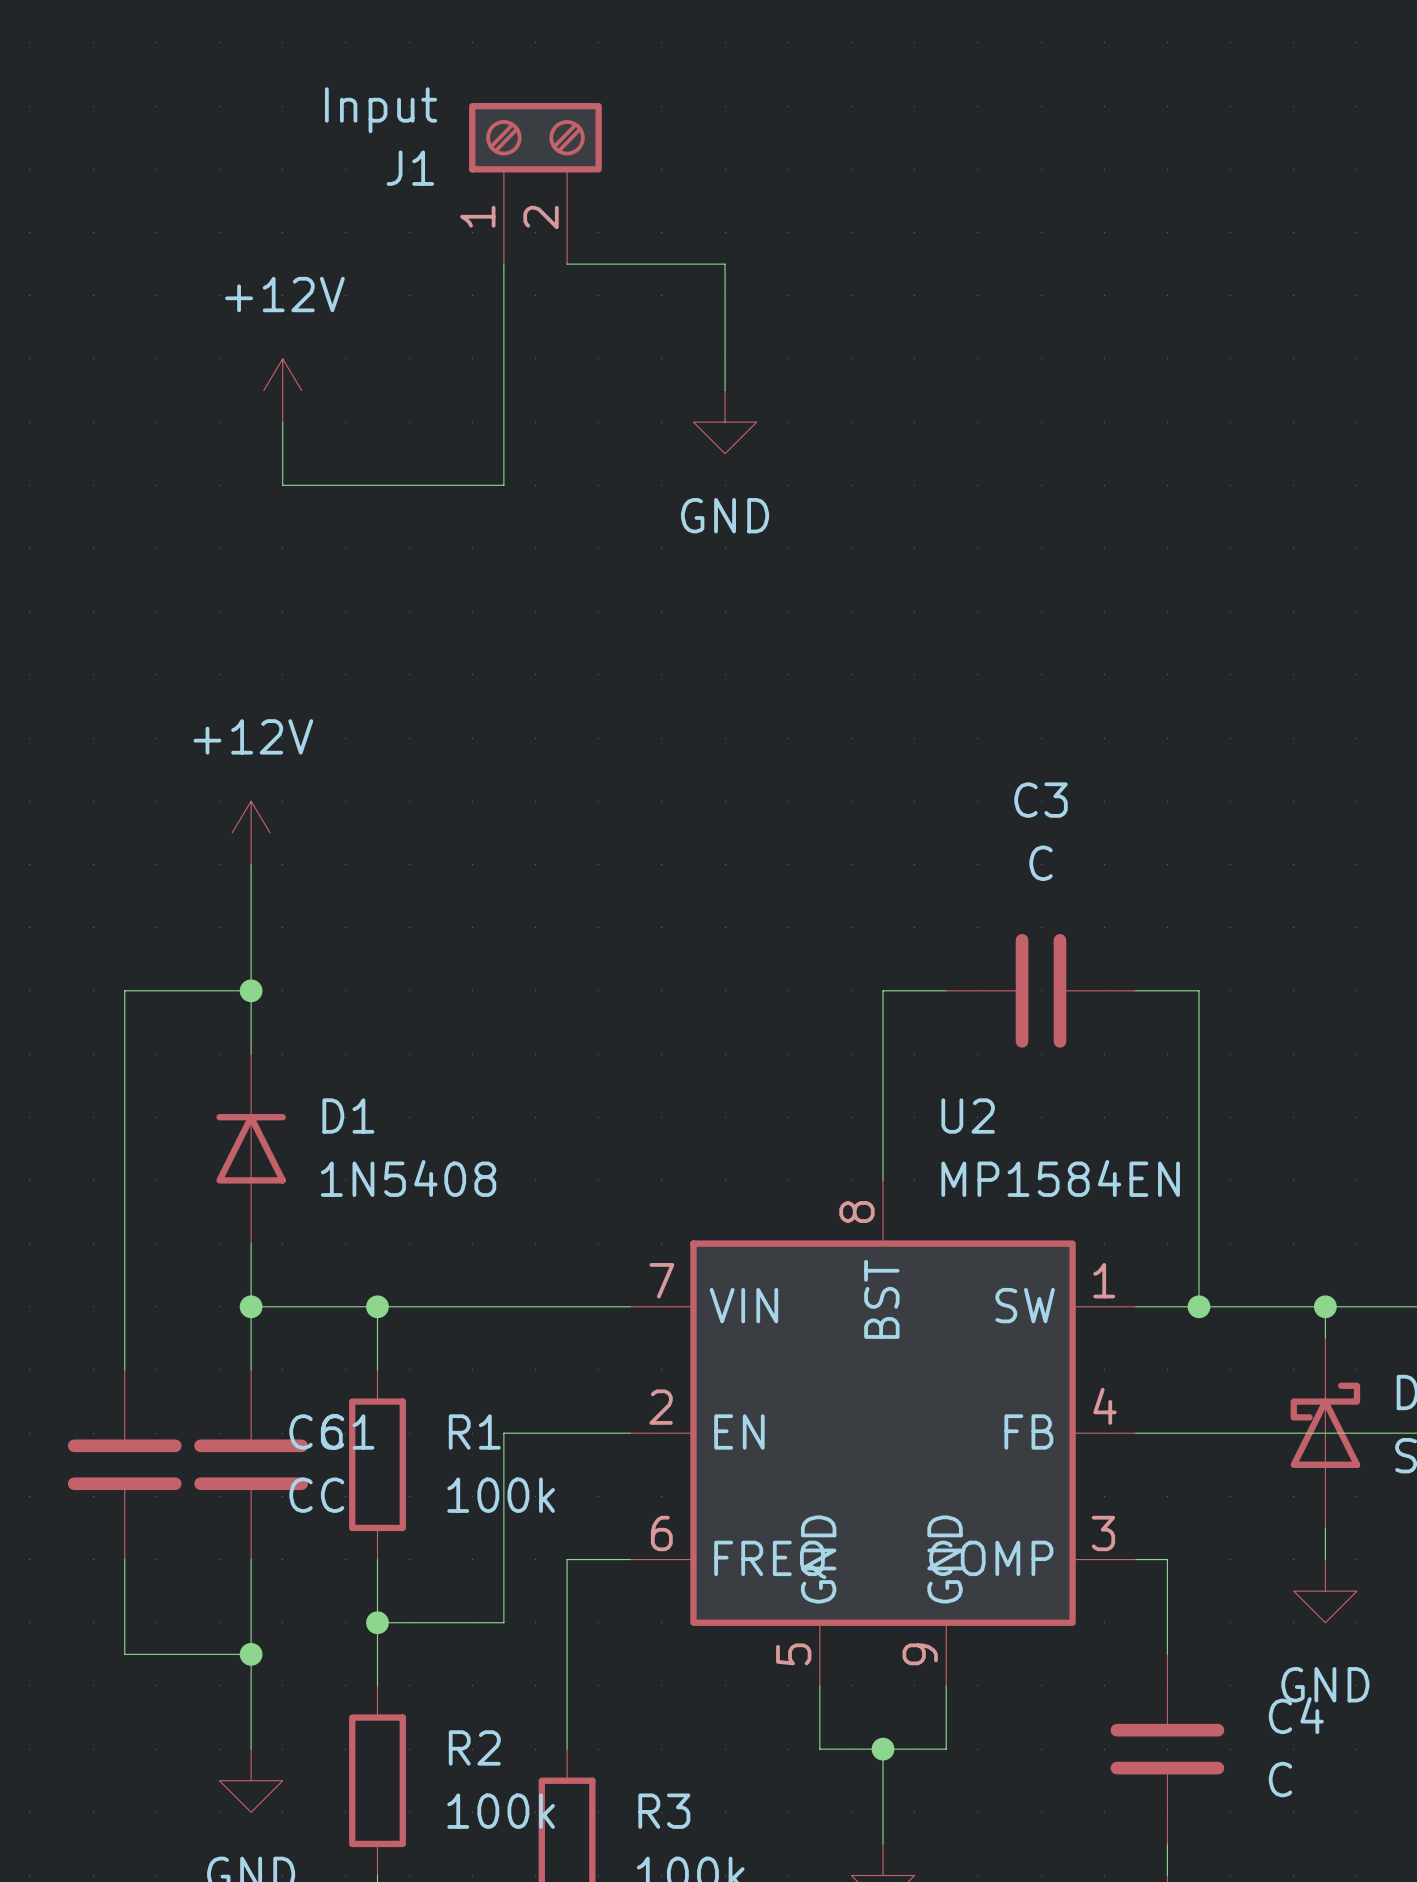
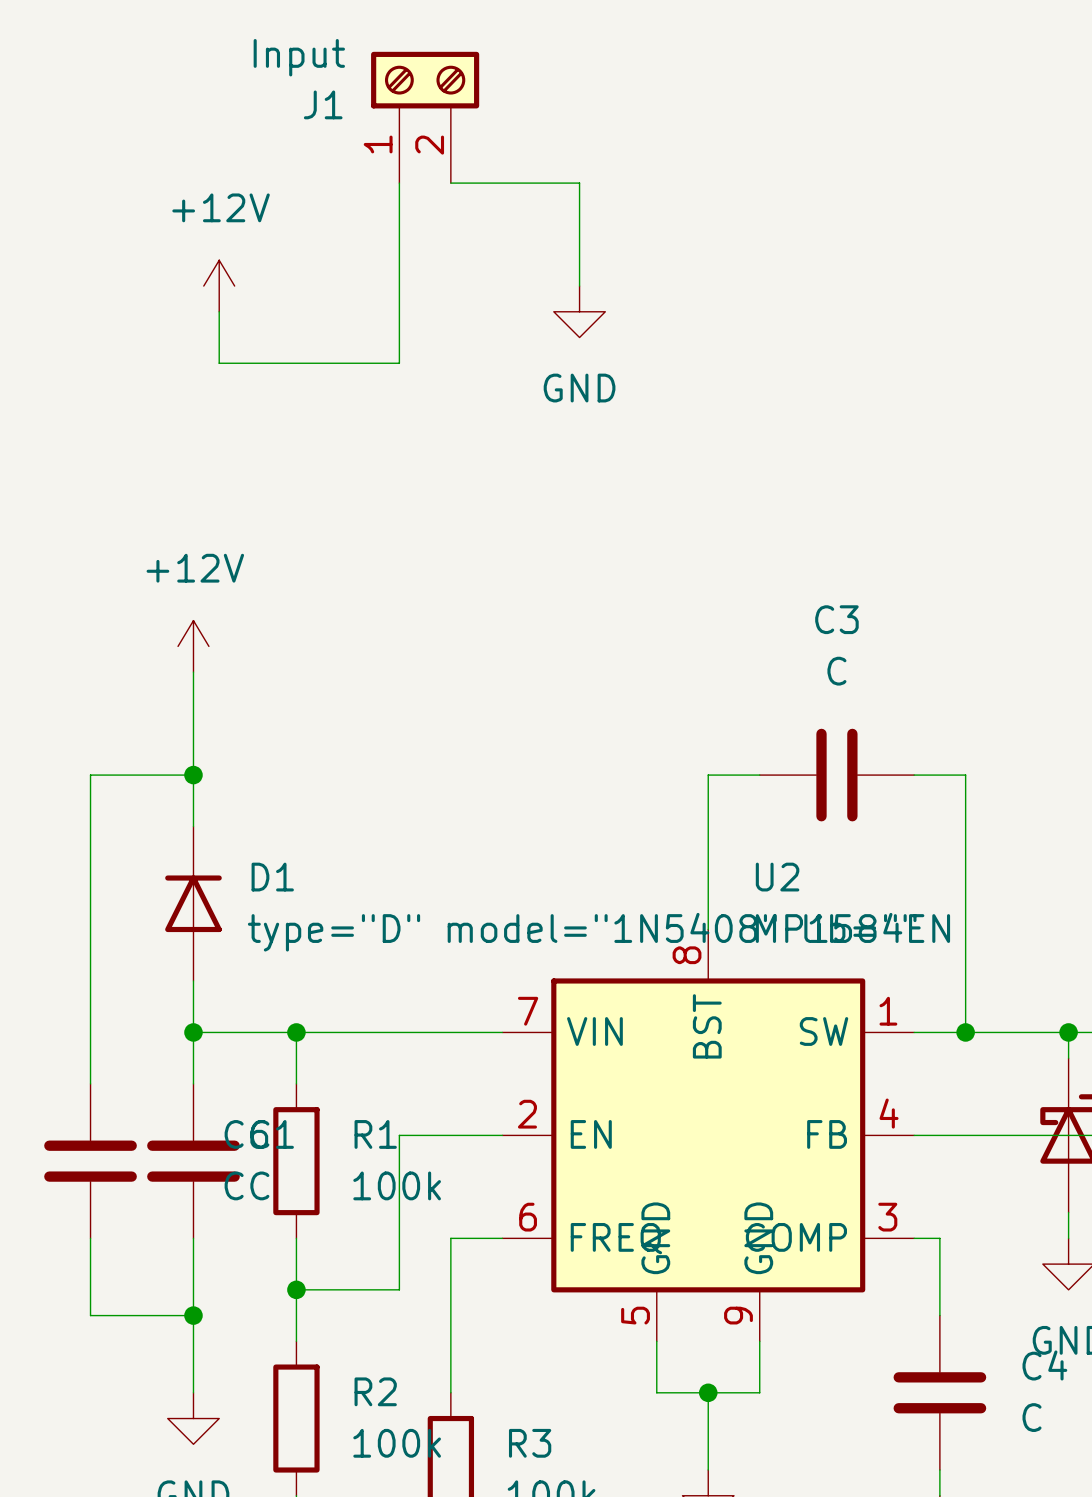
D1 value: 1N5408 (408, 1178) -> type="D" model="1N5408" lib="" (582, 932)

